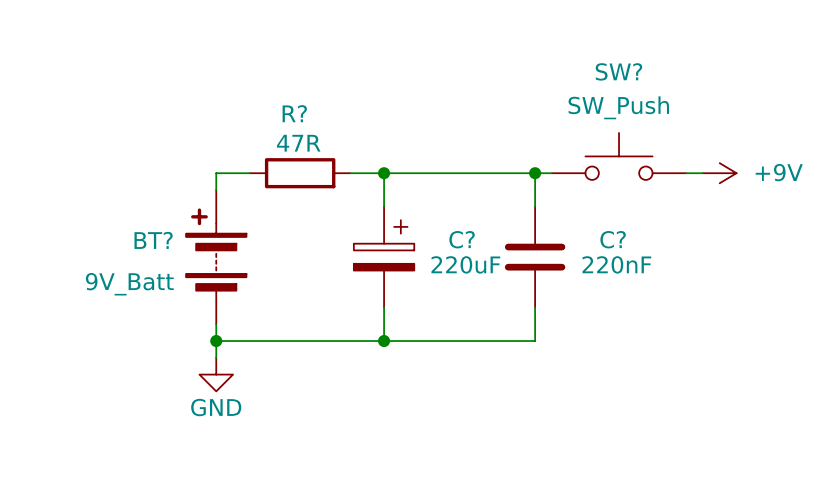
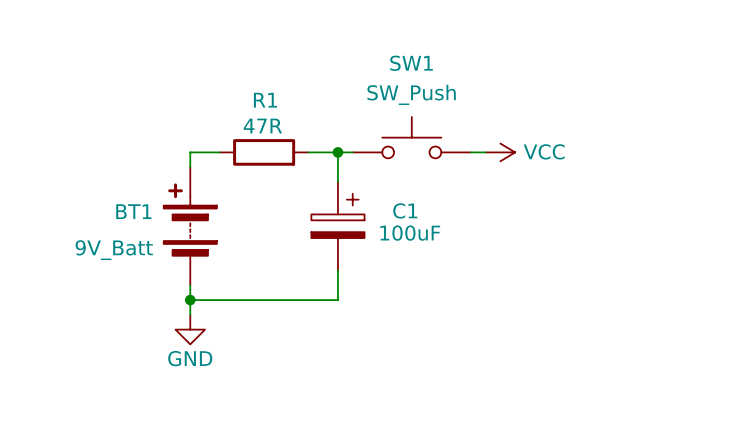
R? name: R? (294, 113) -> R1 (265, 100)
SW1: none -> SW_Push (411, 137)
SW?: SW_Push (619, 156) -> none
wire: (400, 173) (535, 173) (535, 206) -> none
junction: (535, 173) -> none
power symbol: none -> VCC (500, 152)
wire: (686, 173) (702, 173) -> none
power symbol: +9V (719, 173) -> none
C? name: C? (462, 239) -> C1 (405, 210)
BT? name: BT? (153, 240) -> BT1 (133, 211)
C?: 220nF (535, 257) -> none
C? value: 220uF (465, 264) -> 100uF (410, 233)
wire: (535, 307) (535, 341) (384, 341) -> none
junction: (384, 341) -> none

